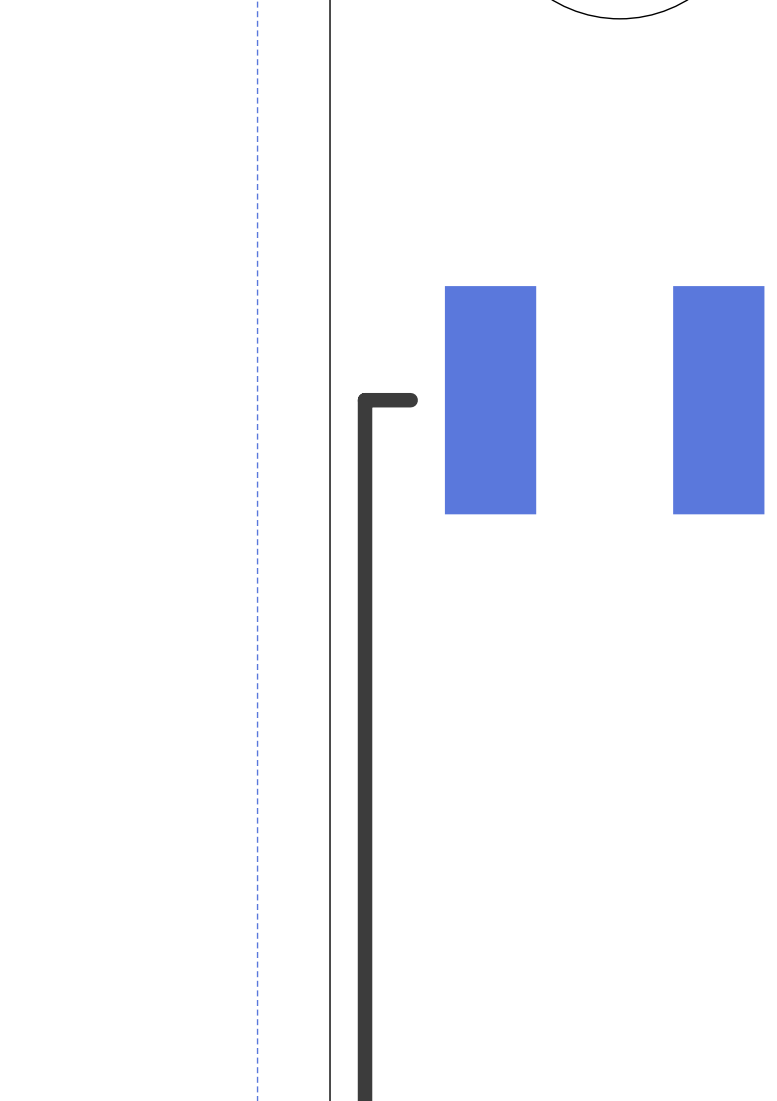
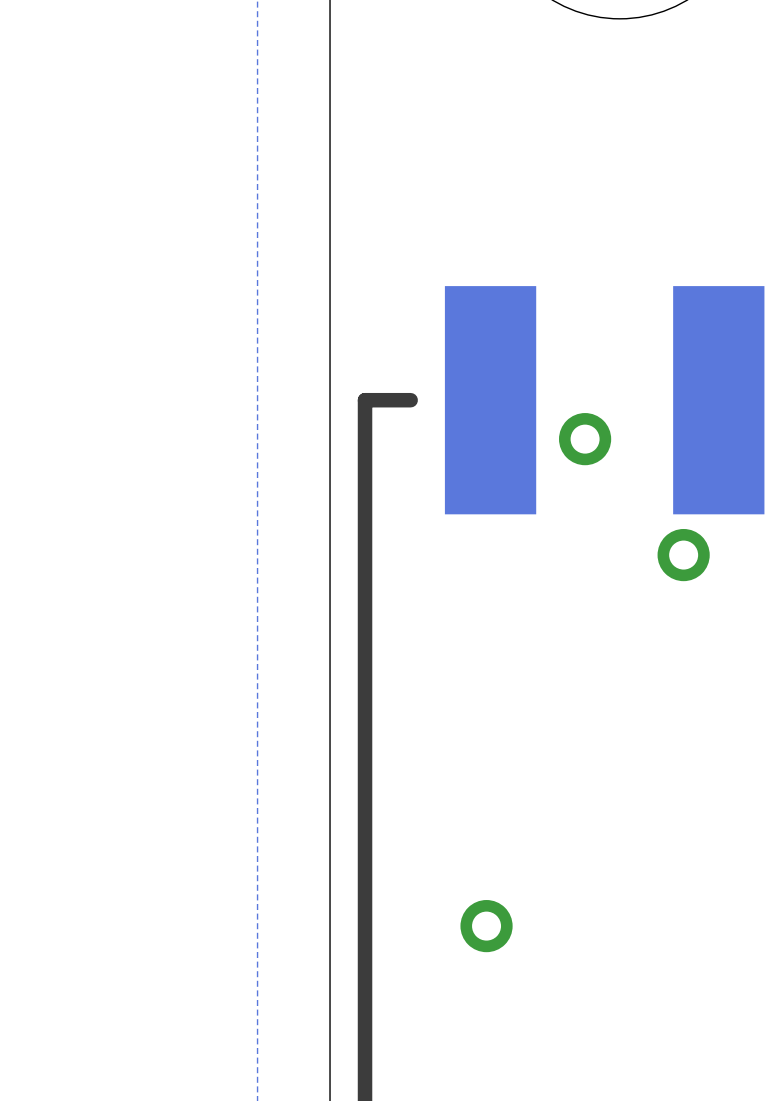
via: none -> (585, 439)
via: none -> (683, 555)
via: none -> (486, 926)

